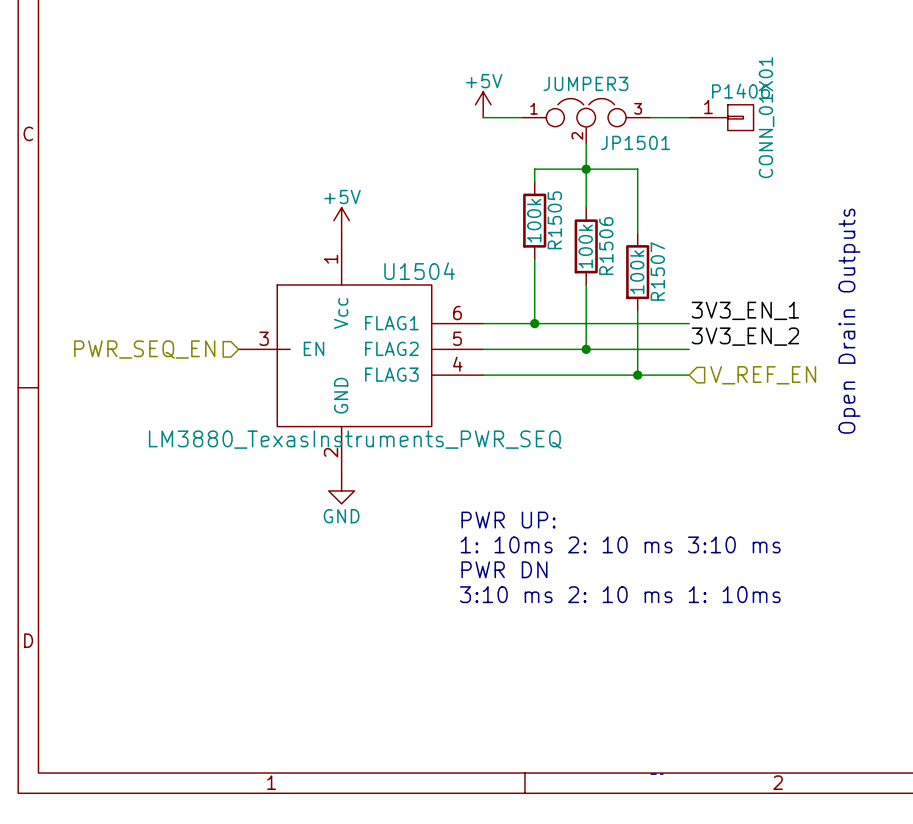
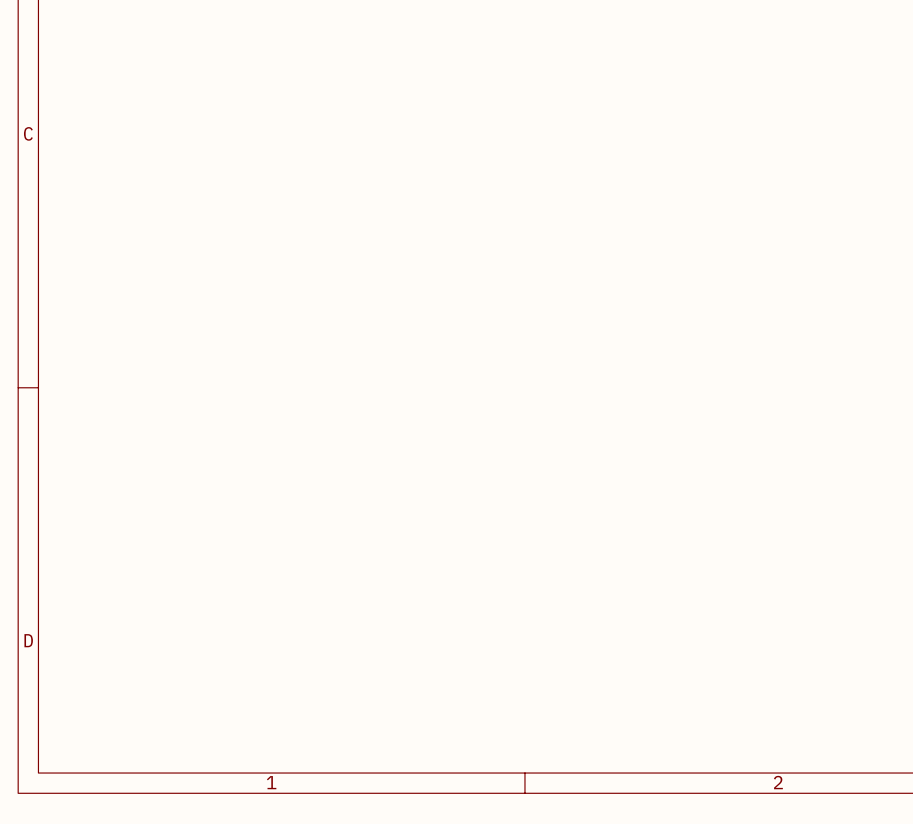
power symbol: +5V (483, 104) -> none
wire: (483, 117) (521, 117) -> none
wire: (650, 117) (689, 117) -> none
P1406: CONN_01X01 (721, 117) -> none
JP1501: JUMPER3 (586, 121) -> none
wire: (586, 143) (586, 207) -> none
junction: (586, 169) -> none
wire: (534, 182) (534, 169) (637, 169) (637, 233) -> none
power symbol: +5V (341, 220) -> none
R1505: 100k (534, 220) -> none
R1506: 100k (586, 246) -> none
wire: (534, 259) (534, 323) -> none
R1507: 100k (637, 272) -> none
wire: (586, 285) (586, 349) -> none
wire: (637, 310) (637, 375) -> none
label: 3V3_EN_1 (745, 310) -> none
text: Open Drain Outputs (849, 321) -> none
wire: (483, 323) (689, 323) -> none
junction: (534, 323) -> none
label: 3V3_EN_2 (745, 336) -> none
hierarchical label: PWR_SEQ_EN (144, 349) -> none
wire: (483, 349) (689, 349) -> none
junction: (586, 349) -> none
U1504: LM3880_TexasInstruments_PWR_SEQ (360, 355) -> none
wire: (483, 375) (689, 375) -> none
junction: (637, 375) -> none
hierarchical label: V_REF_EN (763, 375) -> none
power symbol: GND (341, 490) -> none
text: PWR UP: (508, 520) -> none
text: 1: 10ms 2: 10 ms 3:10 ms (620, 544) -> none
text: PWR DN (504, 569) -> none
text: 3:10 ms 2: 10 ms 1: 10ms (620, 594) -> none
line: (650, 774) (663, 774) -> none

